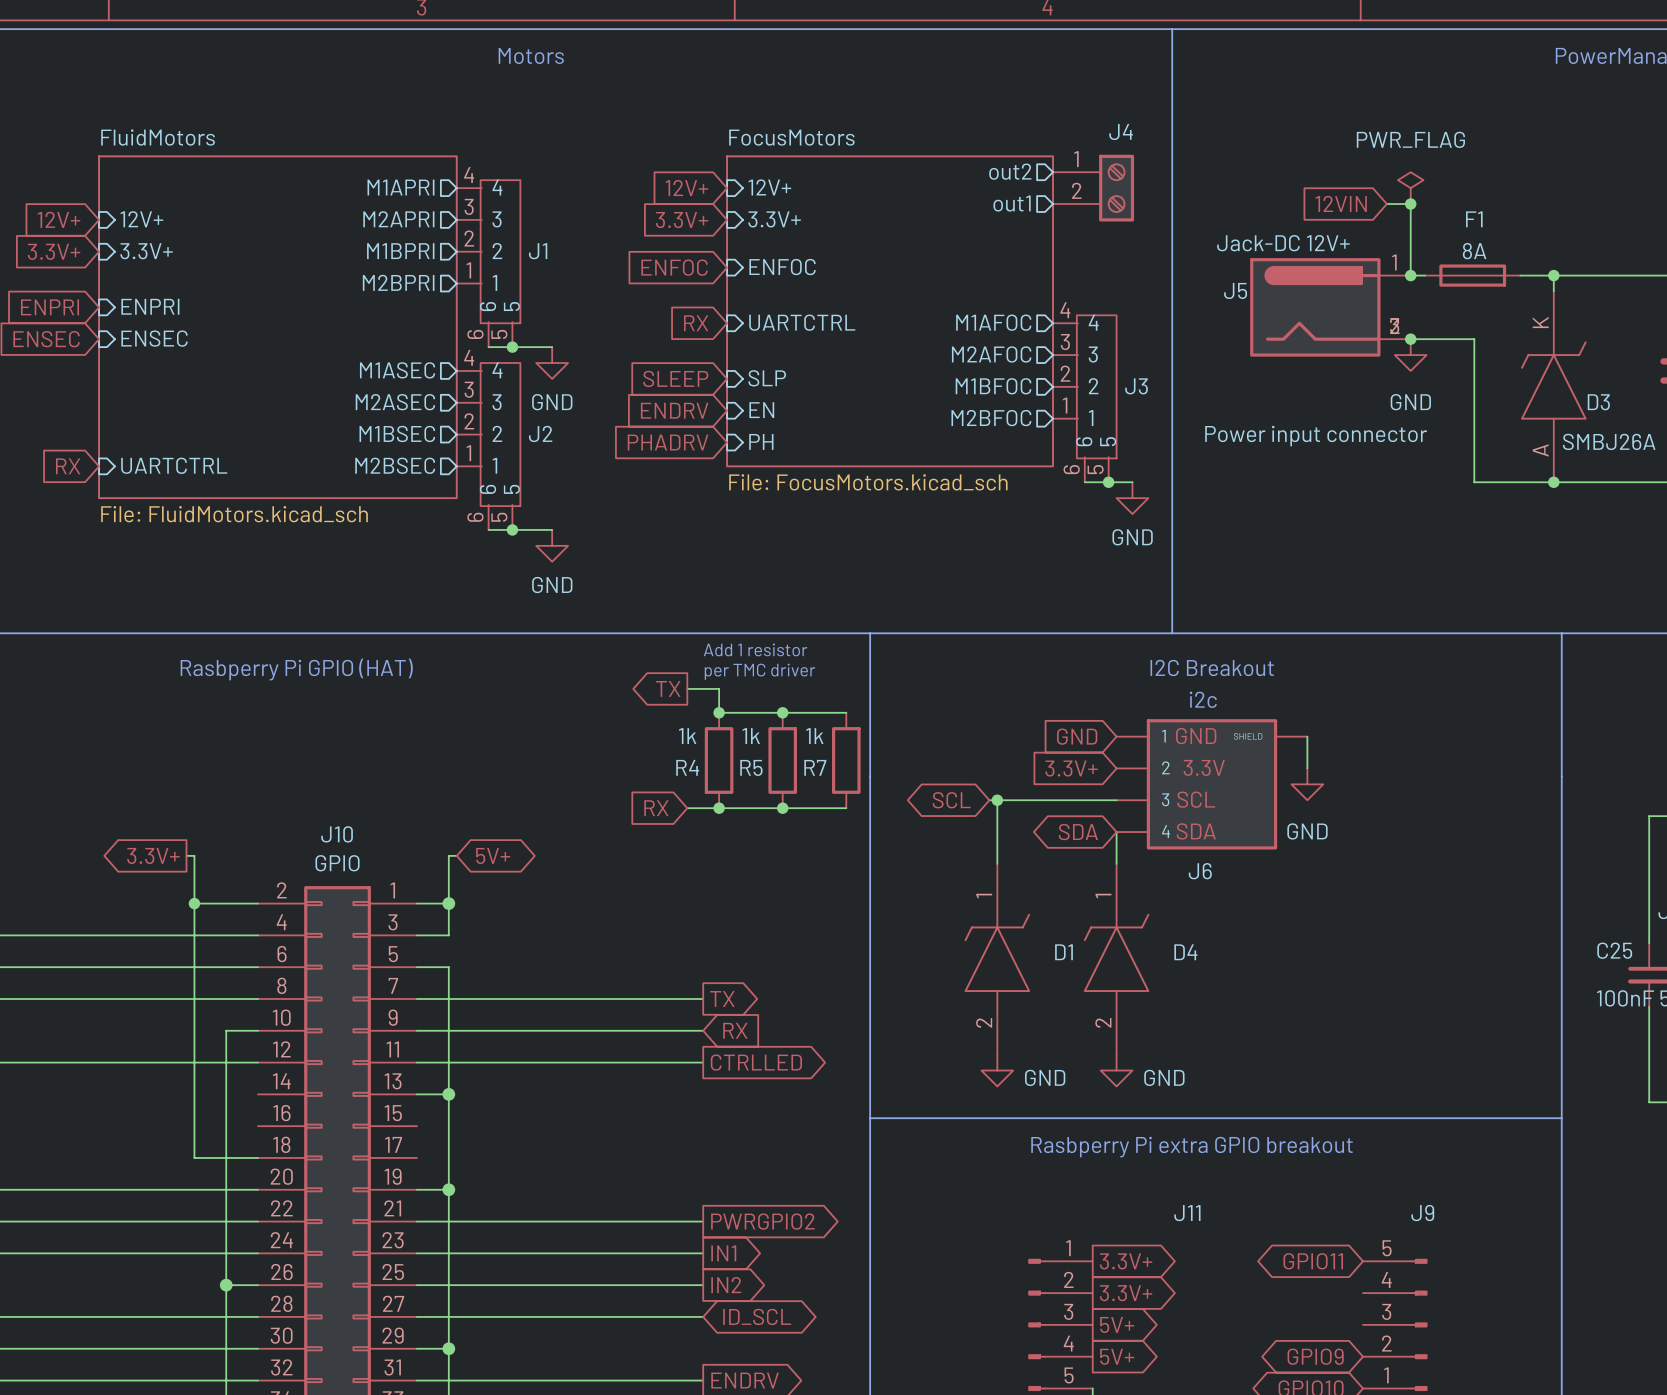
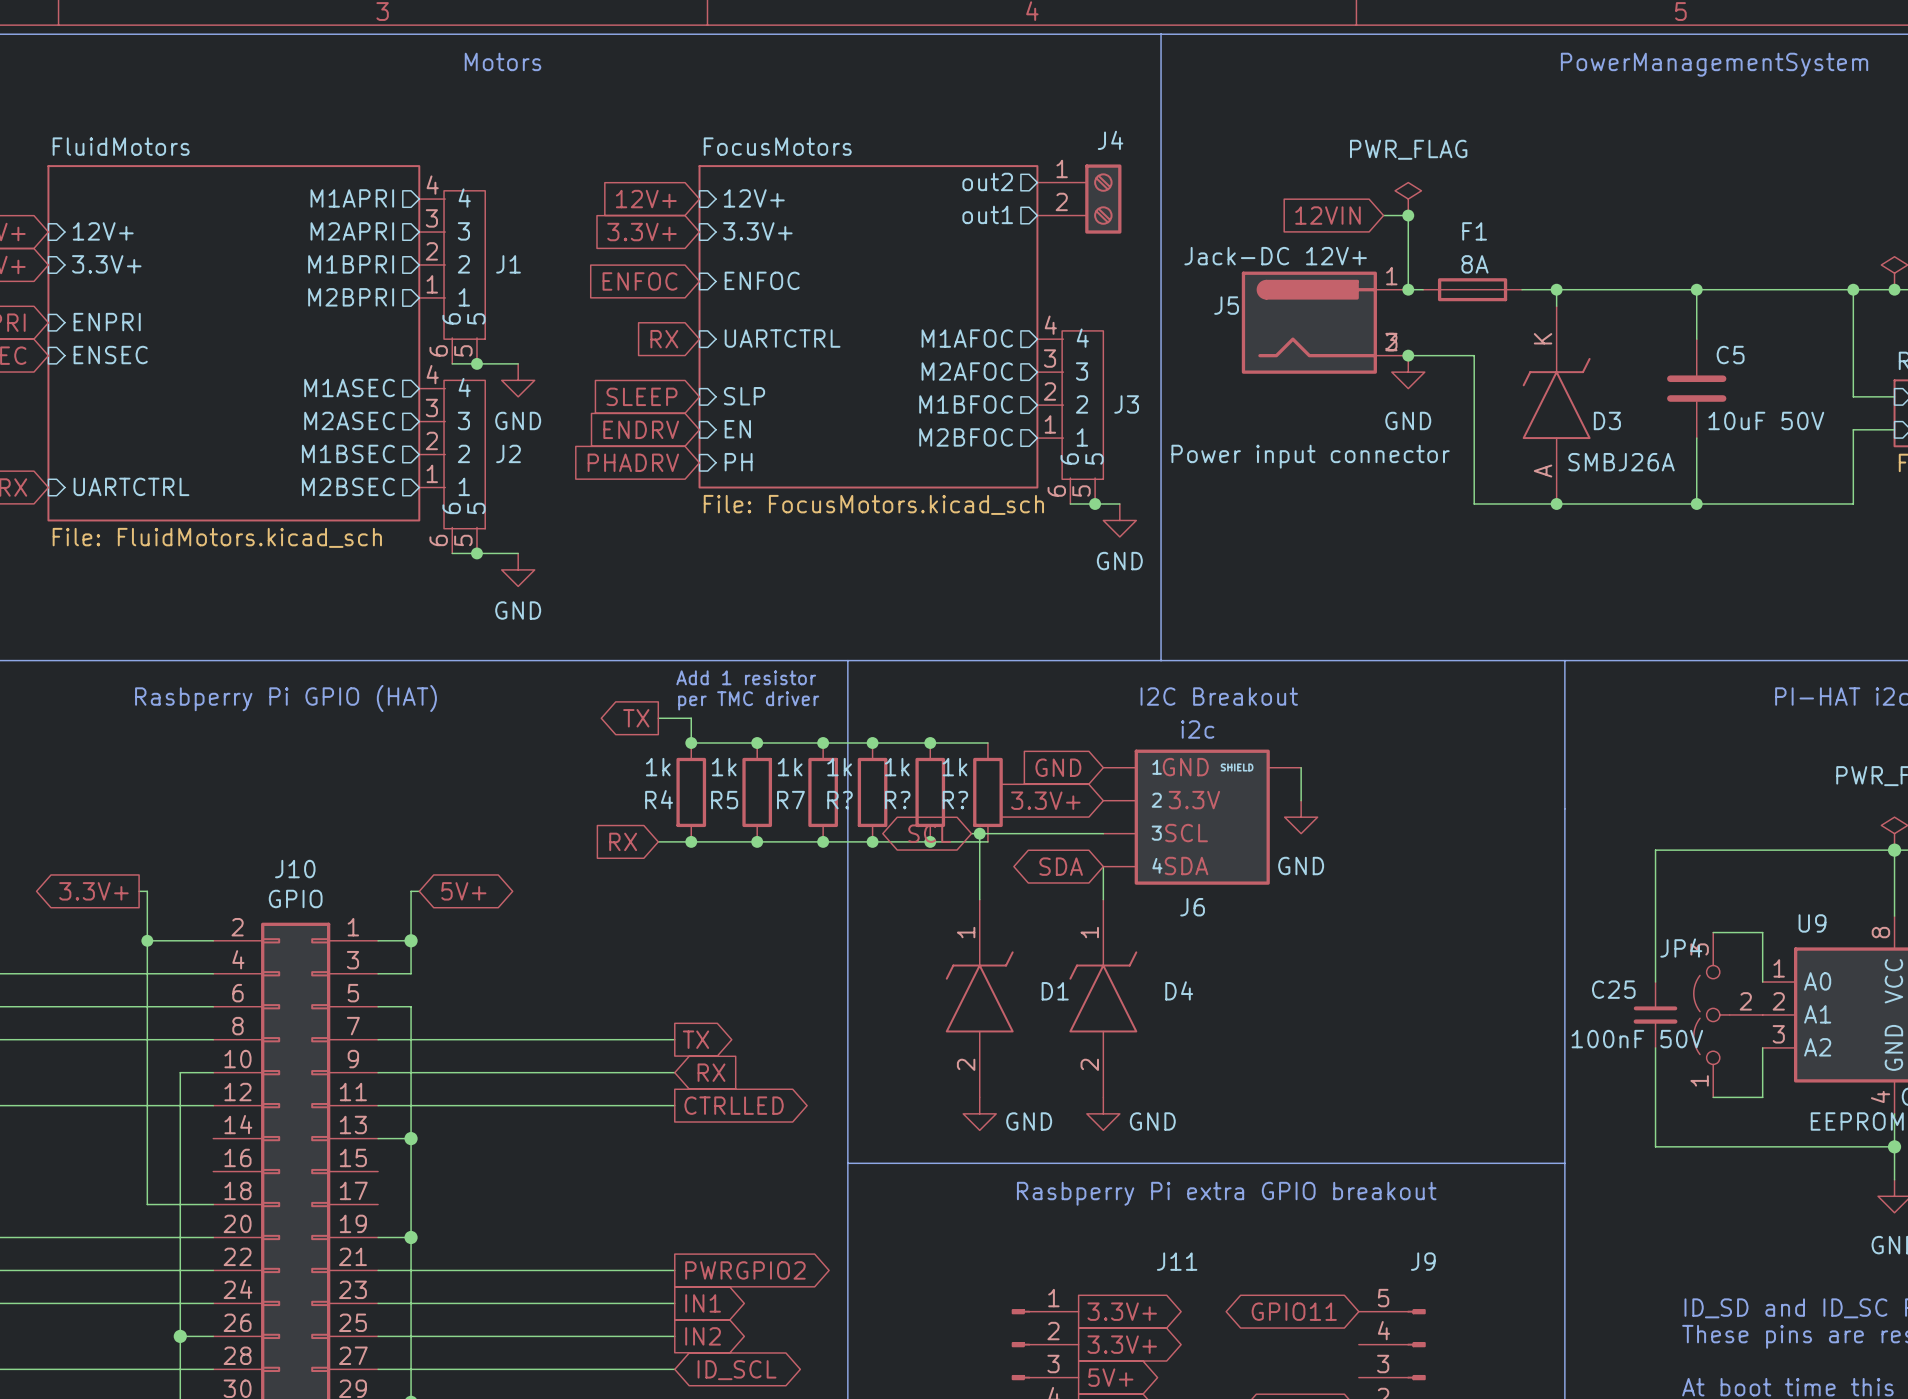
wire: none -> (823, 743) (987, 743)
junction: none -> (823, 743)
junction: none -> (872, 743)
junction: none -> (930, 743)
R?: none -> 1k (872, 792)
R?: none -> 1k (930, 792)
R?: none -> 1k (987, 792)
wire: none -> (823, 841) (987, 841)
junction: none -> (823, 841)
junction: none -> (872, 841)
junction: none -> (930, 841)

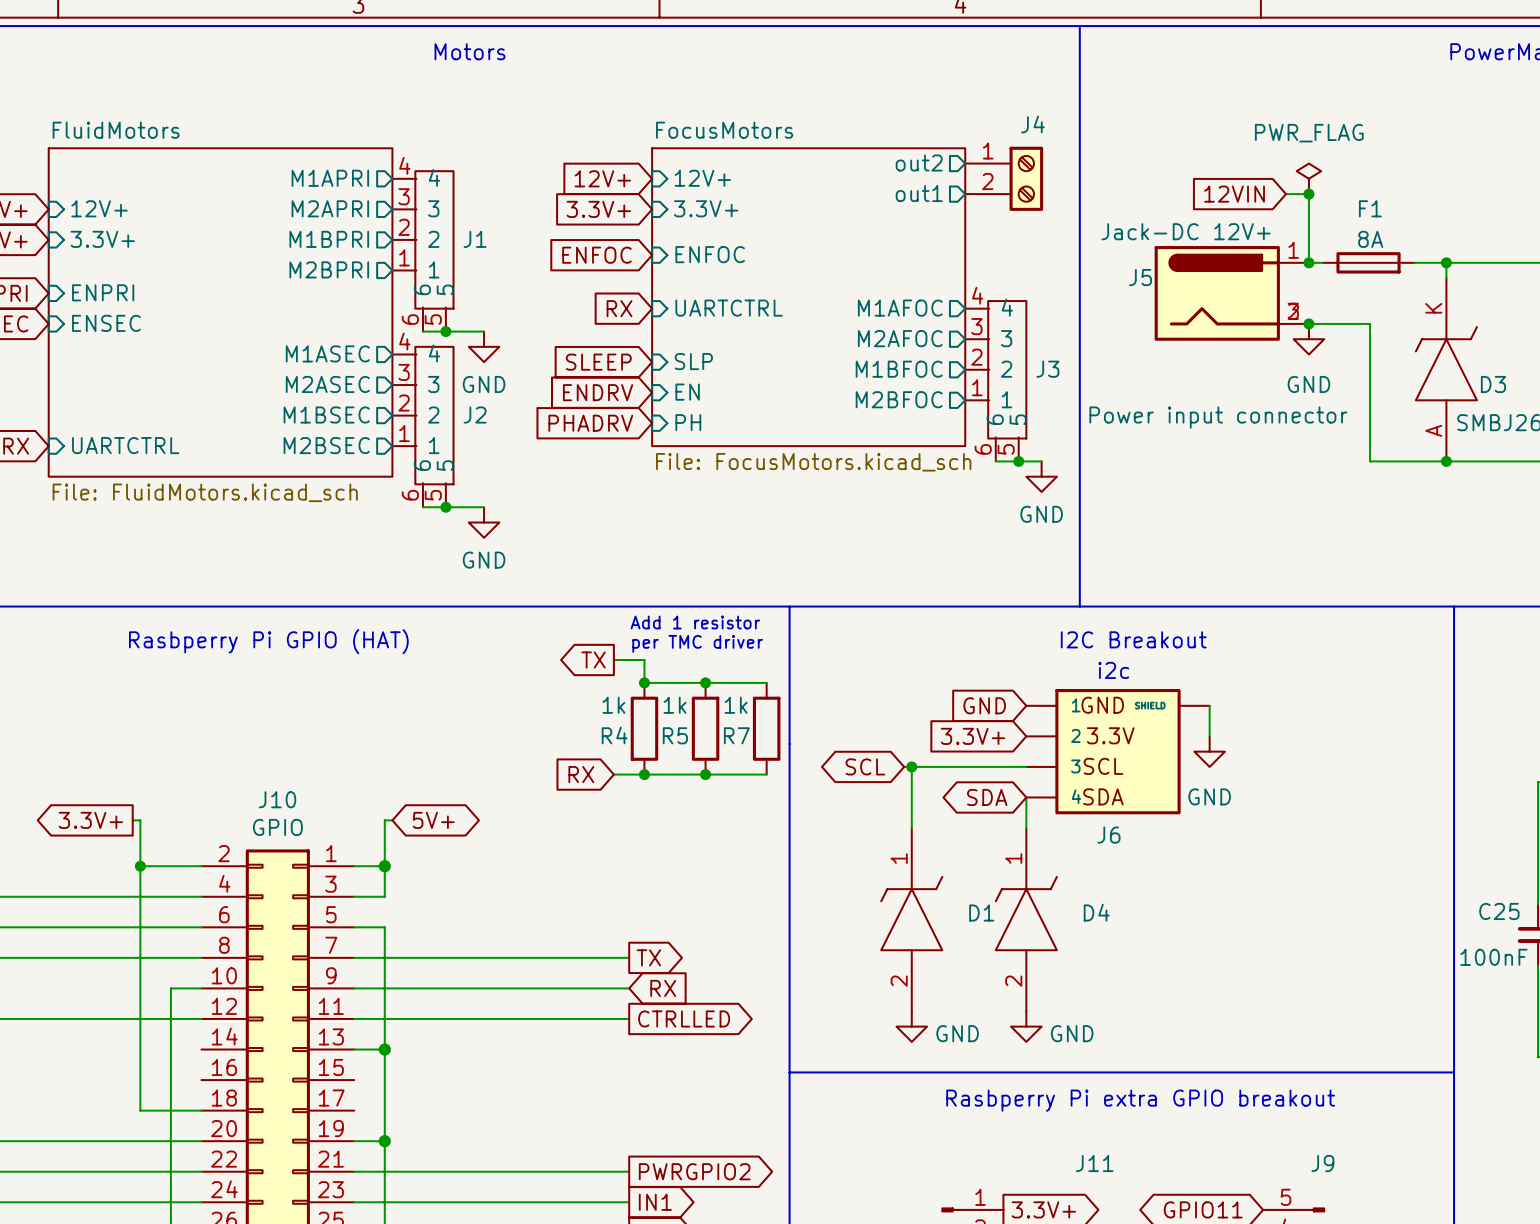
wire: (823, 743) (987, 743) -> none
junction: (823, 743) -> none
junction: (872, 743) -> none
junction: (930, 743) -> none
R?: 1k (872, 792) -> none
R?: 1k (930, 792) -> none
R?: 1k (987, 792) -> none
wire: (823, 841) (987, 841) -> none
junction: (823, 841) -> none
junction: (872, 841) -> none
junction: (930, 841) -> none

